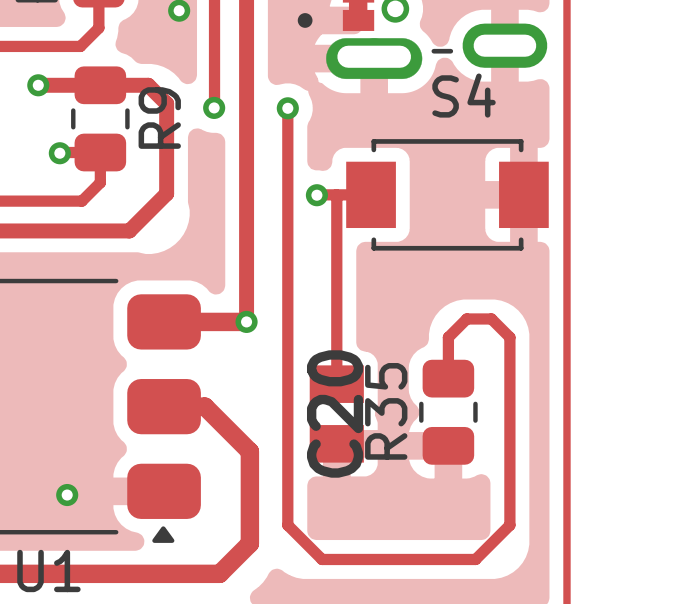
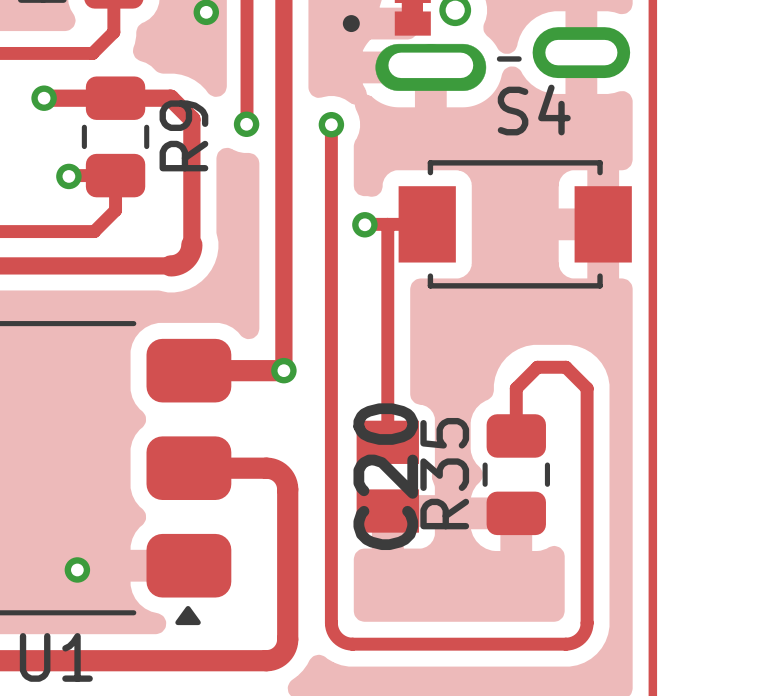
track: (166, 193) (129, 230) -> (191, 223) (191, 247) (185, 259) (173, 265) (149, 265)
track: (204, 406) (249, 451) -> (235, 468) (269, 468) (281, 474) (287, 486) (287, 519)
track: (287, 525) (322, 559) -> (331, 604) (331, 625) (337, 637) (349, 644) (370, 644)
track: (509, 525) (475, 559) -> (587, 604) (586, 625) (580, 637) (568, 644) (547, 644)
track: (249, 543) (219, 573) -> (287, 625) (286, 645) (281, 654) (272, 659) (252, 660)

